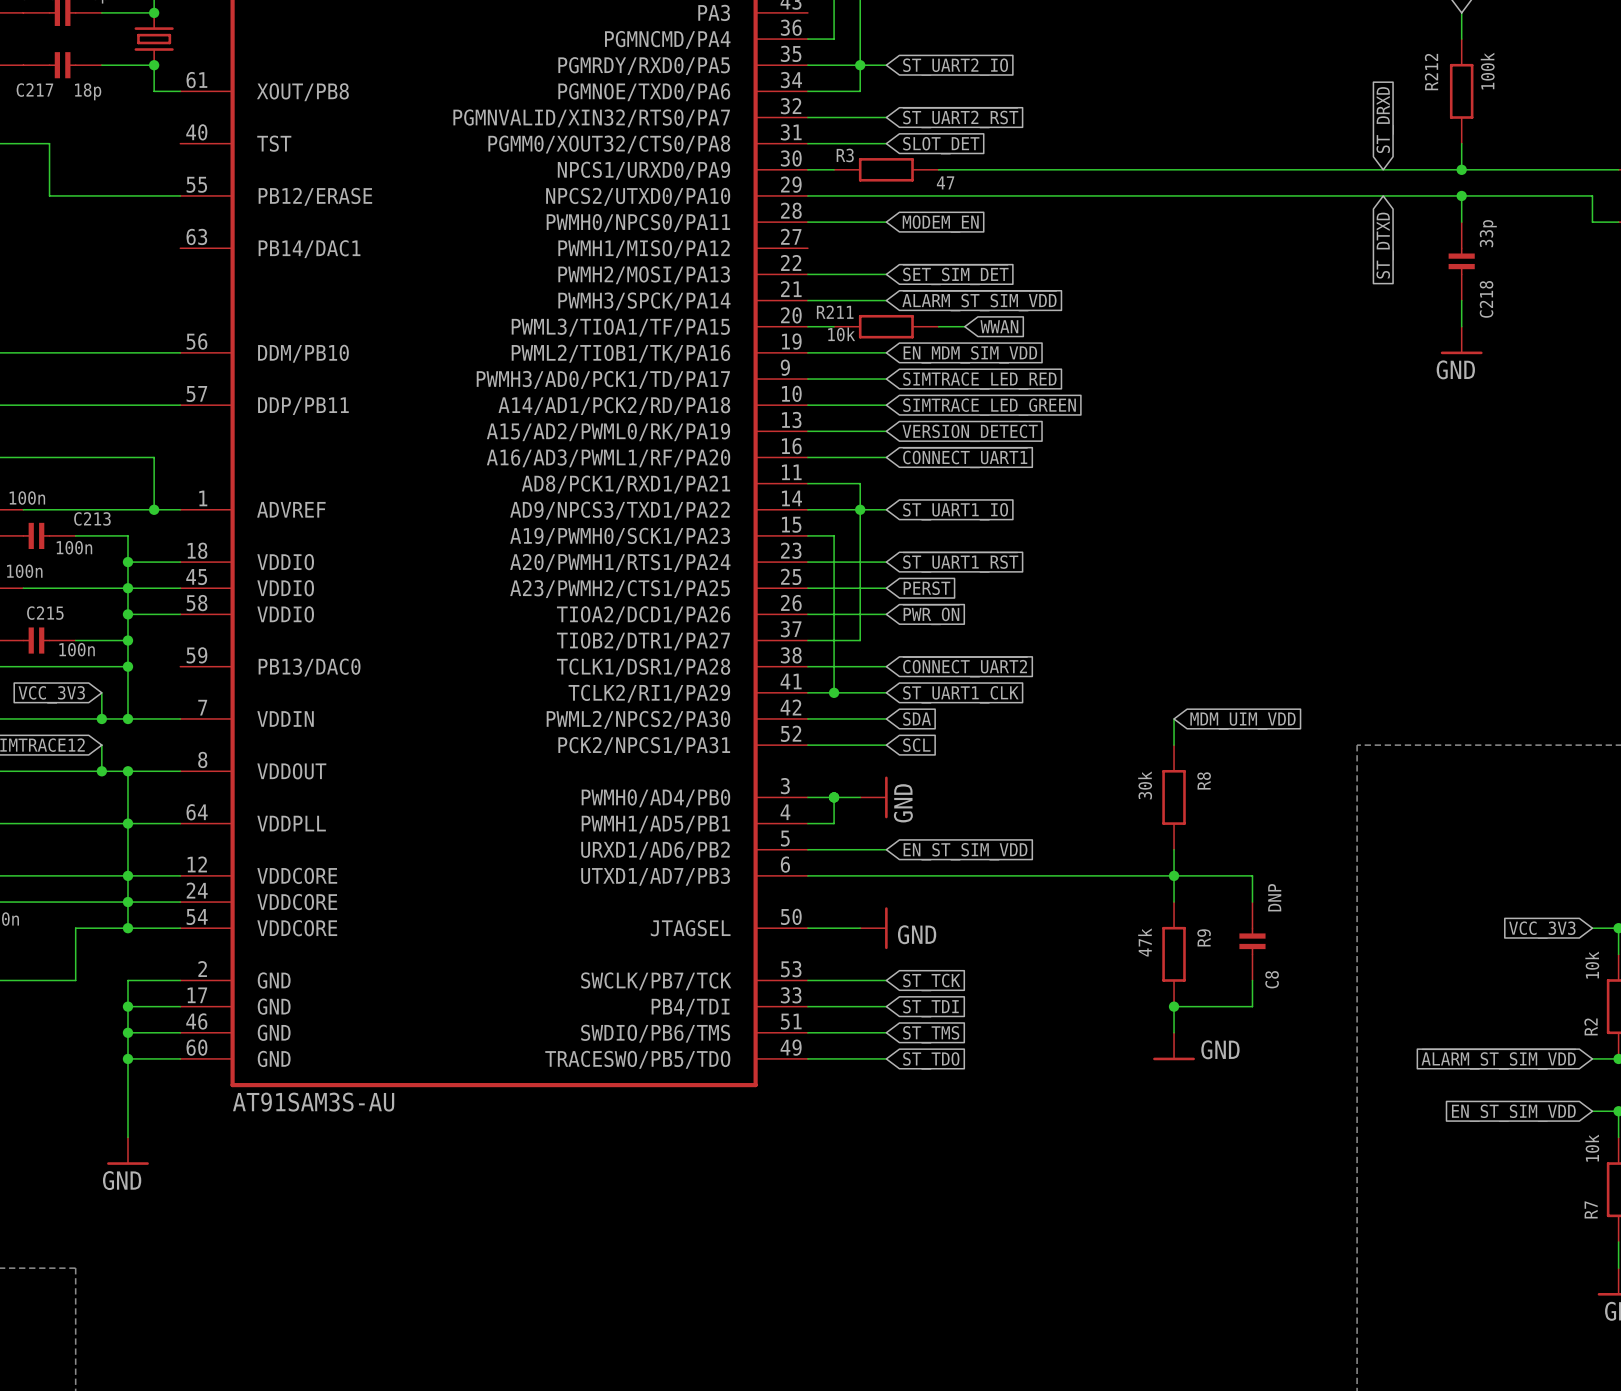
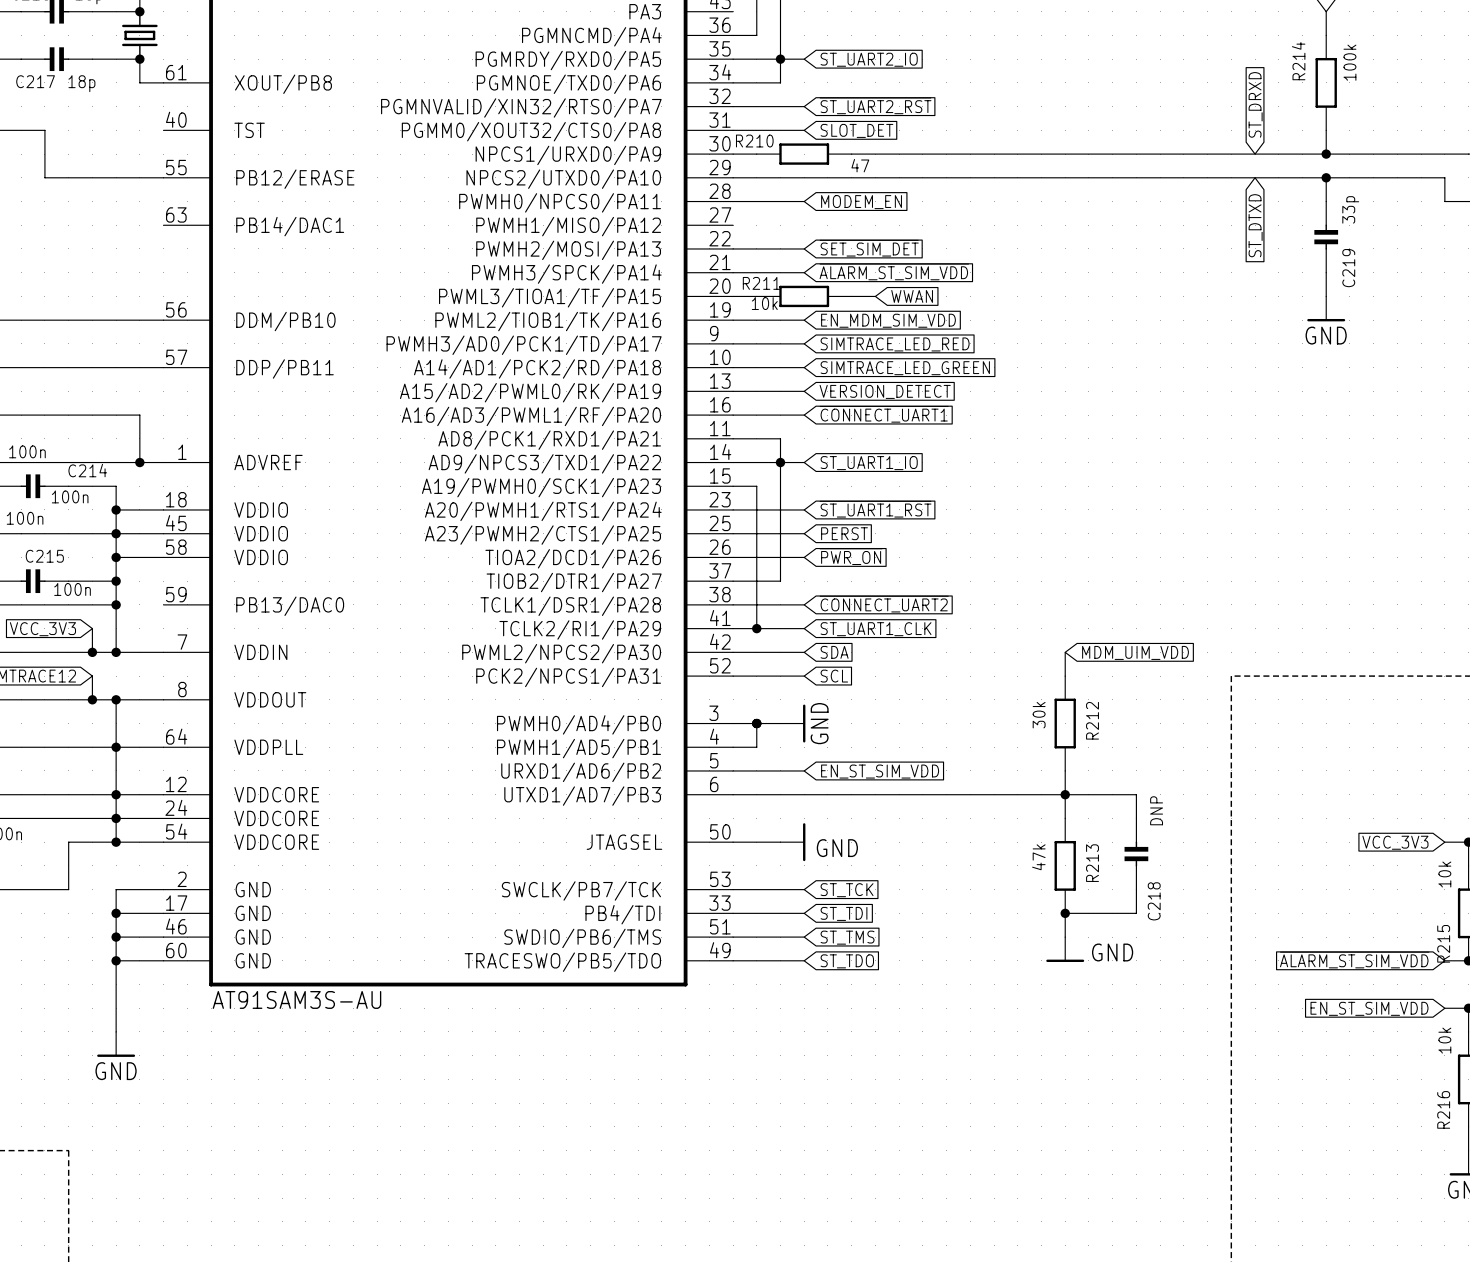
R212 name: R212 (1431, 72) -> R214 (1298, 61)
R3 name: R3 (845, 155) -> R210 (754, 141)
C218 name: C218 (1486, 299) -> C219 (1348, 268)
C213 name: C213 (92, 518) -> C214 (87, 470)
R8 name: R8 (1204, 780) -> R212 (1092, 720)
R9 name: R9 (1204, 937) -> R213 (1092, 863)
C8 name: C8 (1272, 979) -> C218 (1154, 901)
R2 name: R2 (1591, 1026) -> R215 (1443, 943)
R7 name: R7 (1591, 1209) -> R216 (1443, 1109)

